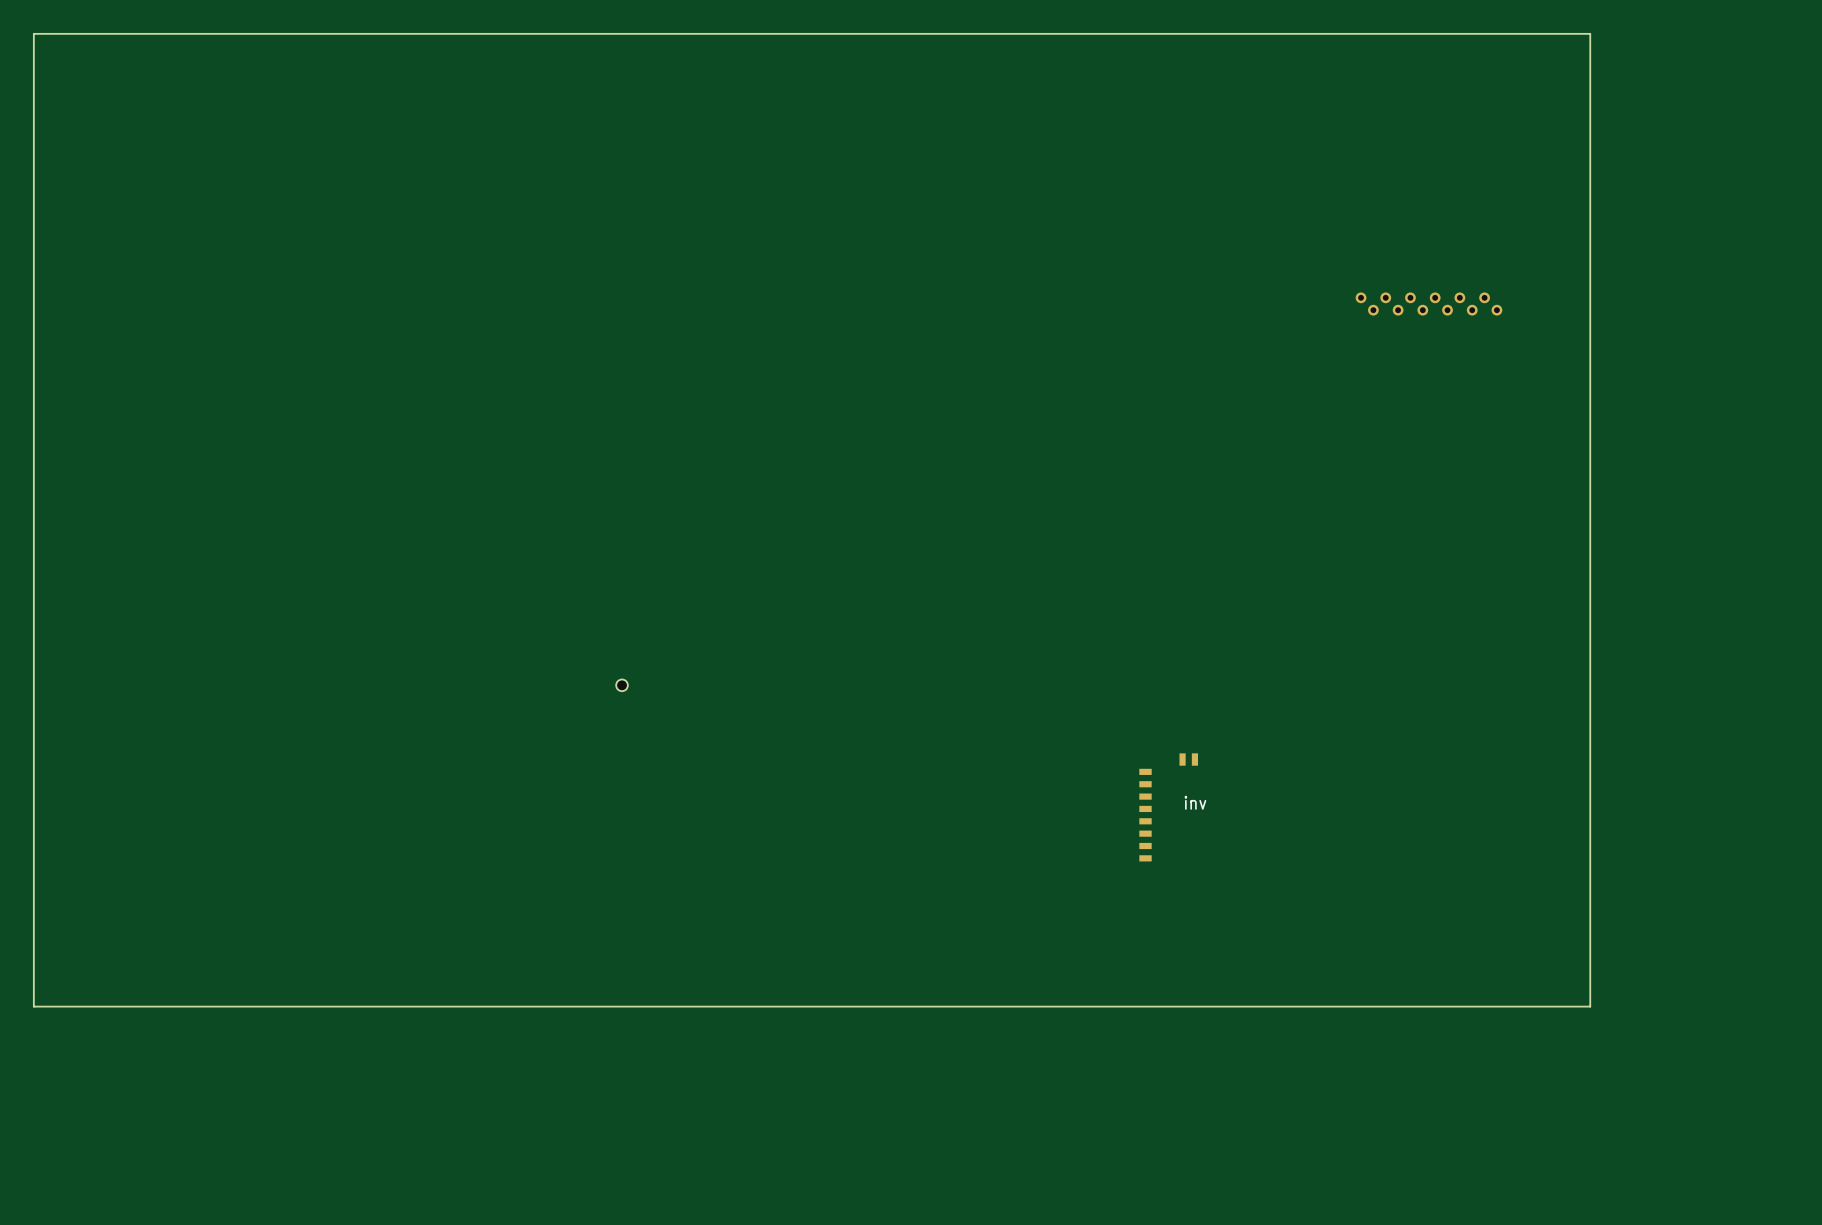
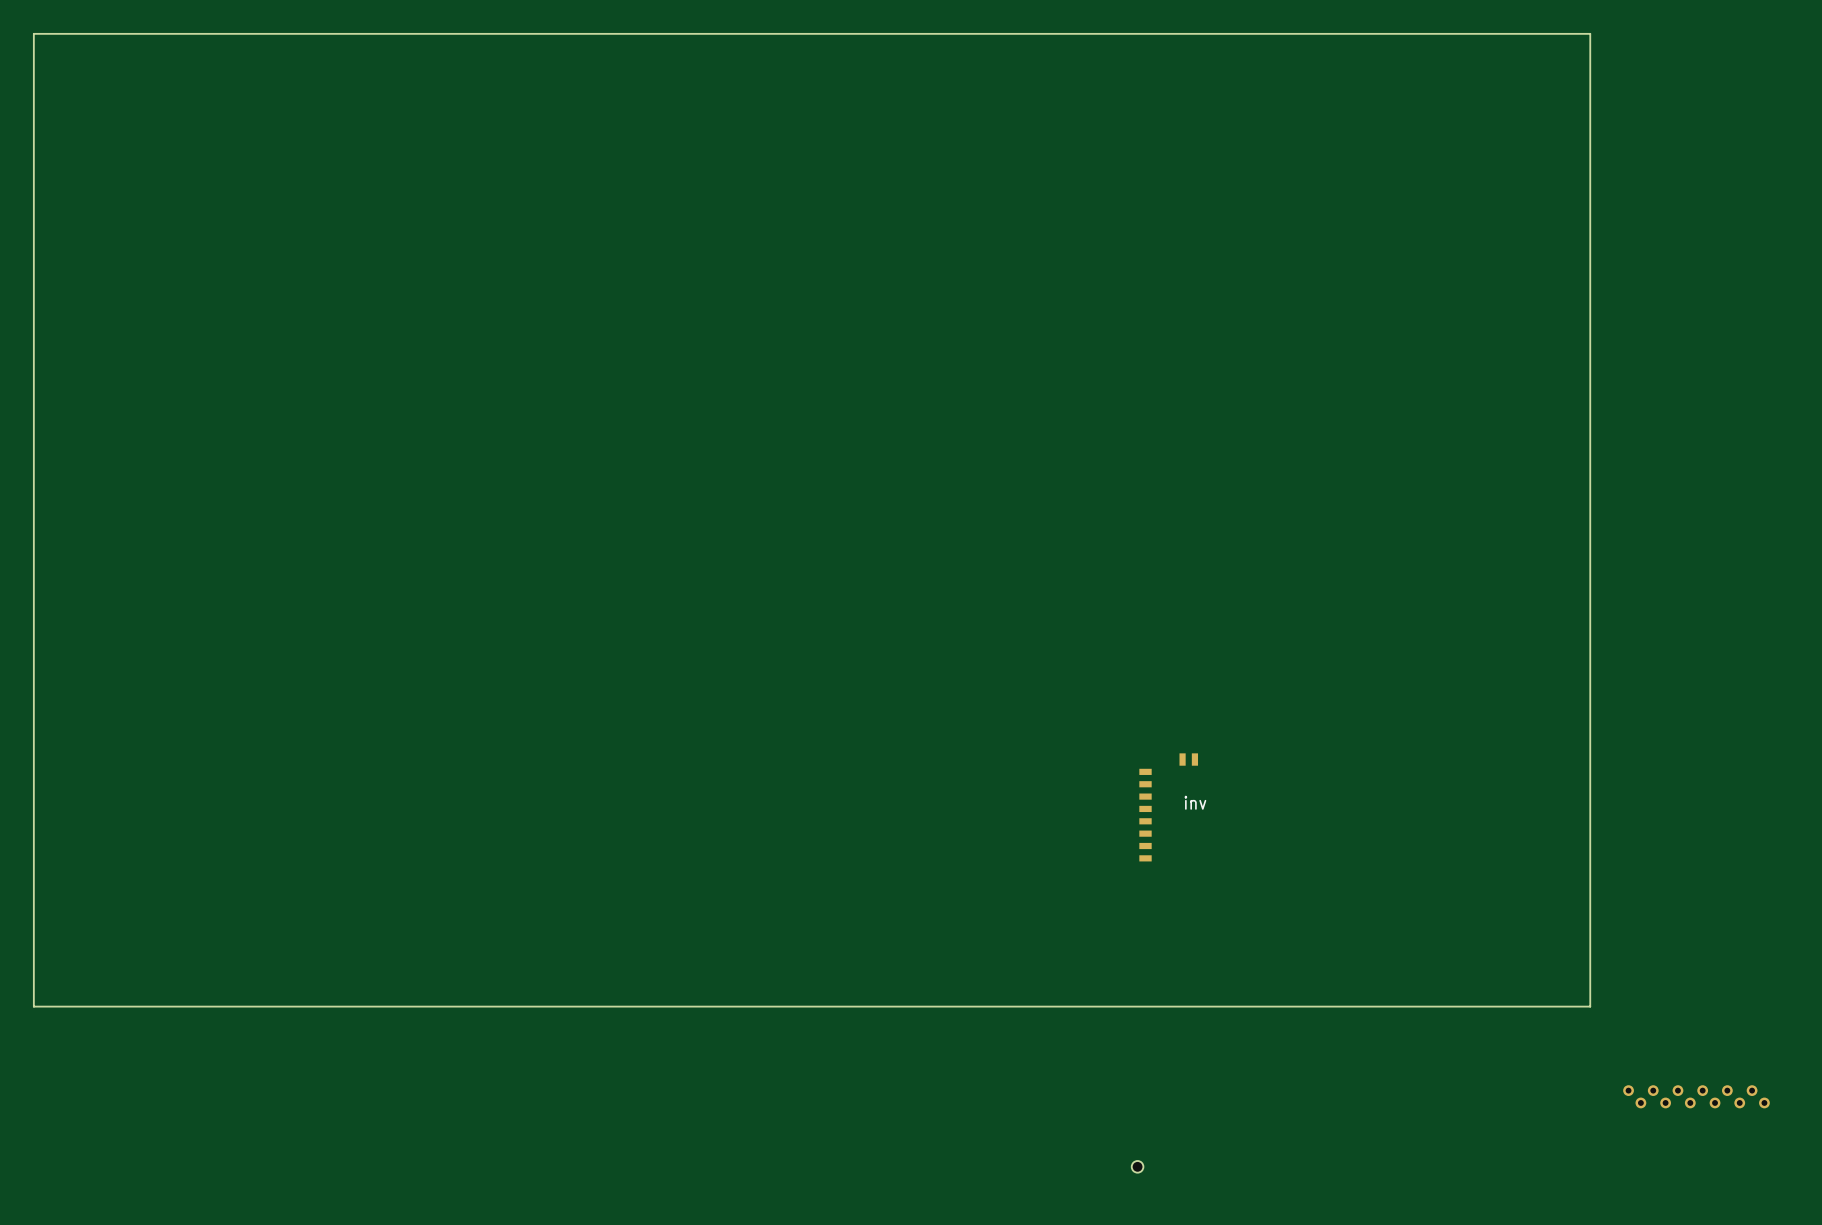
part: (1428, 304) -> none
part: (622, 685) -> none
part: none -> (1696, 1096)
part: none -> (1137, 1166)

